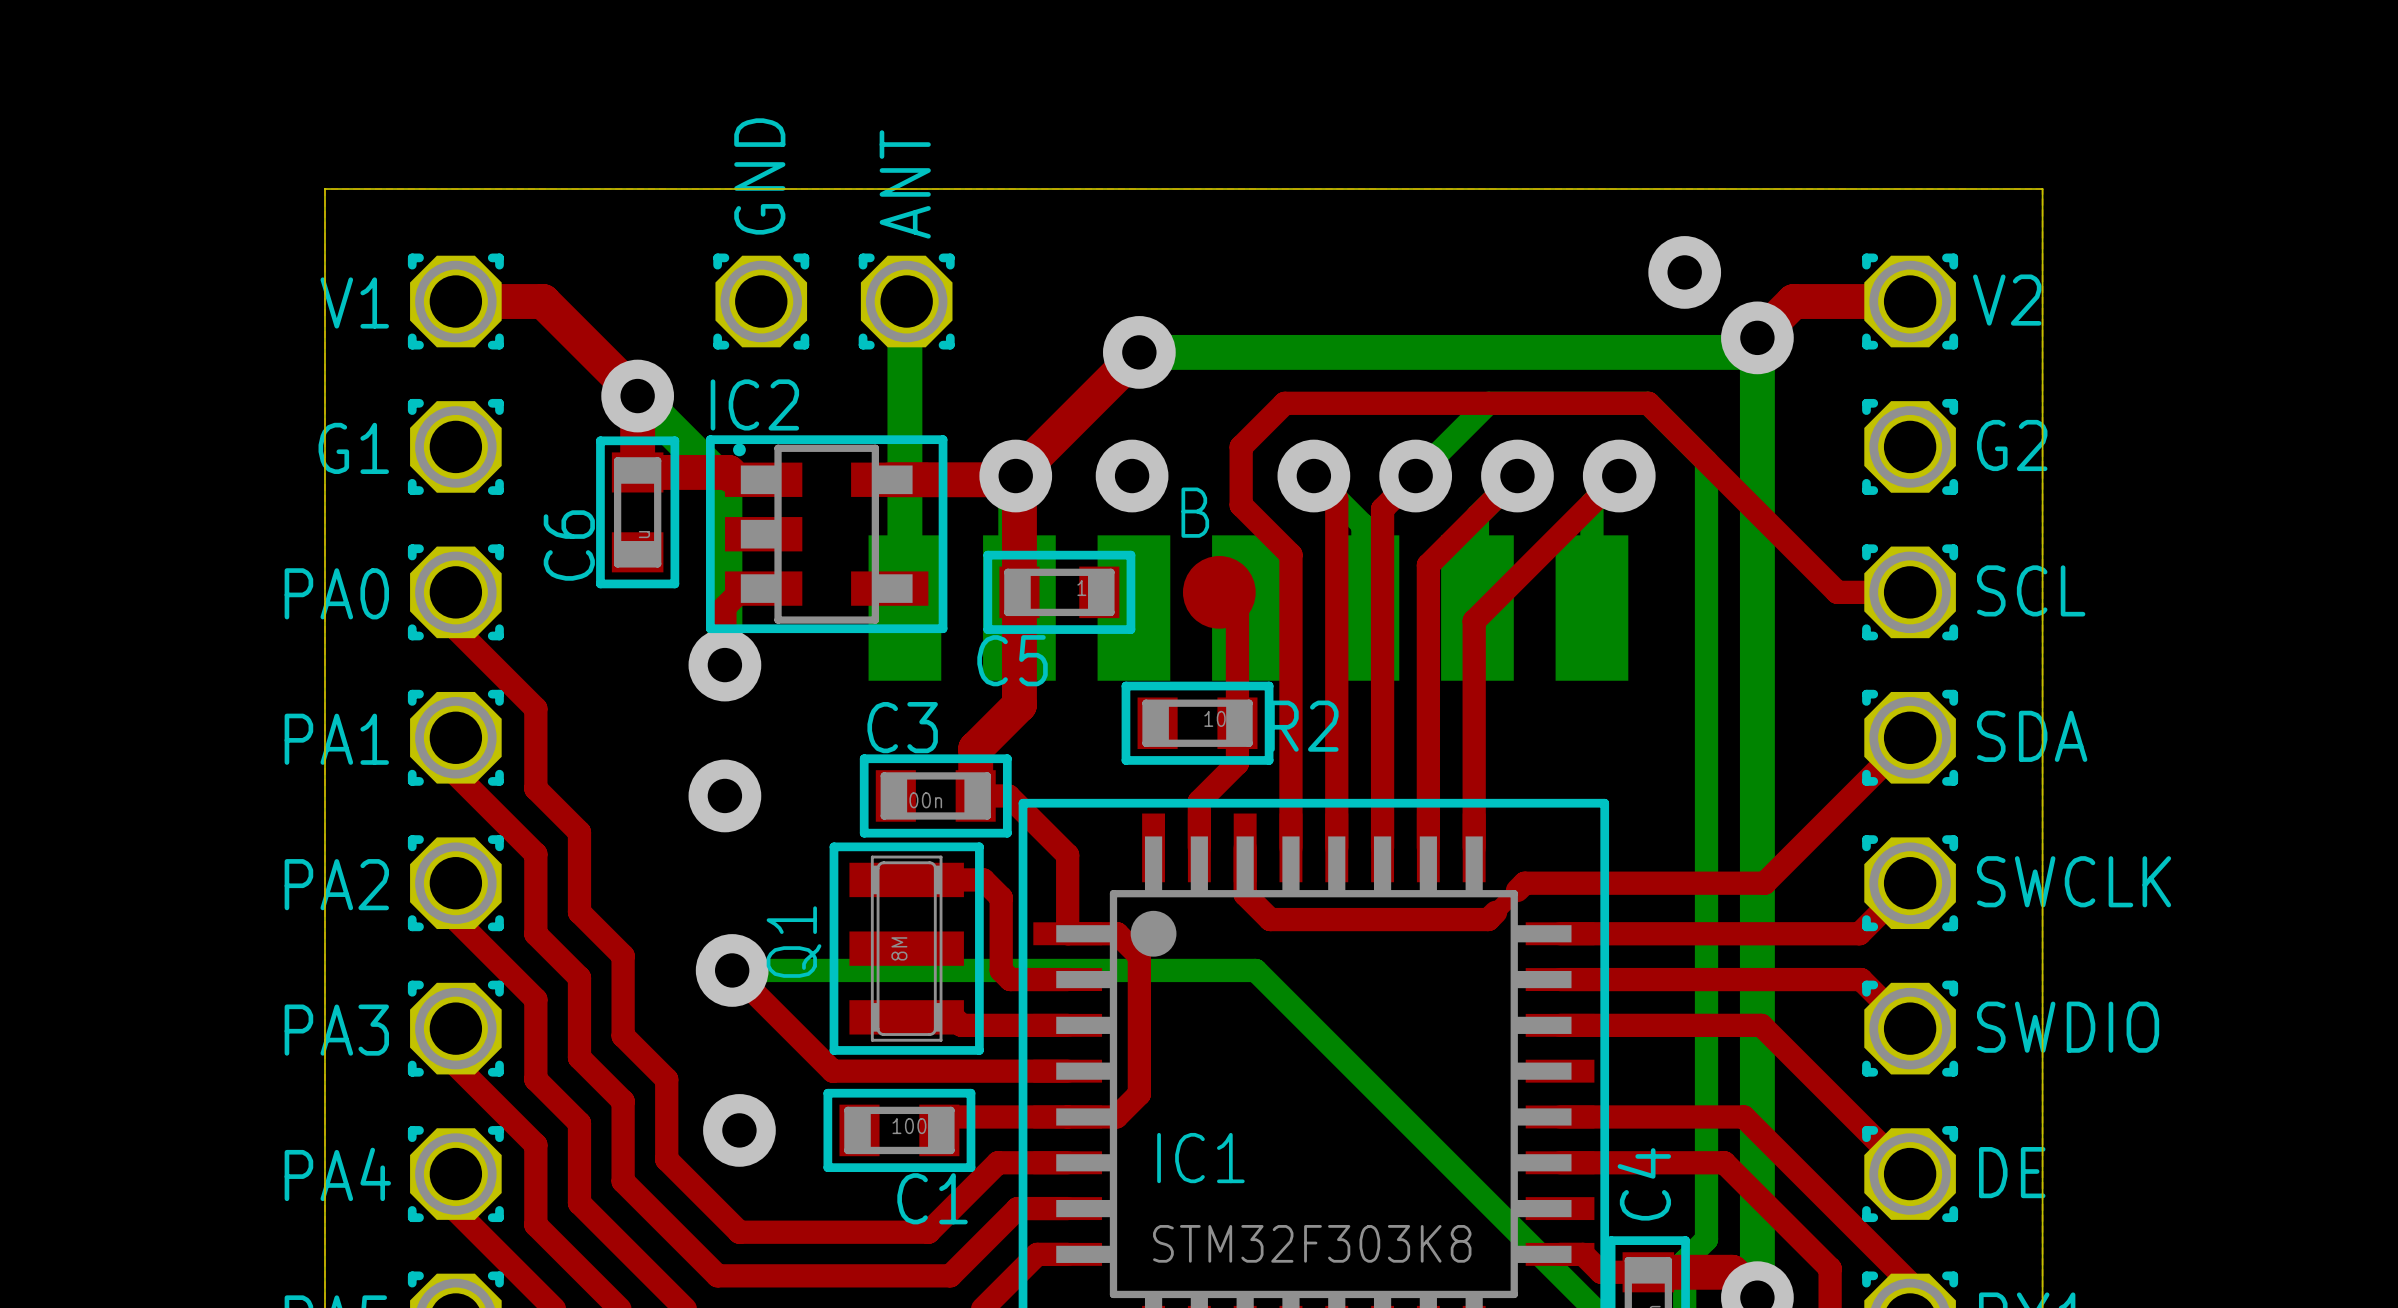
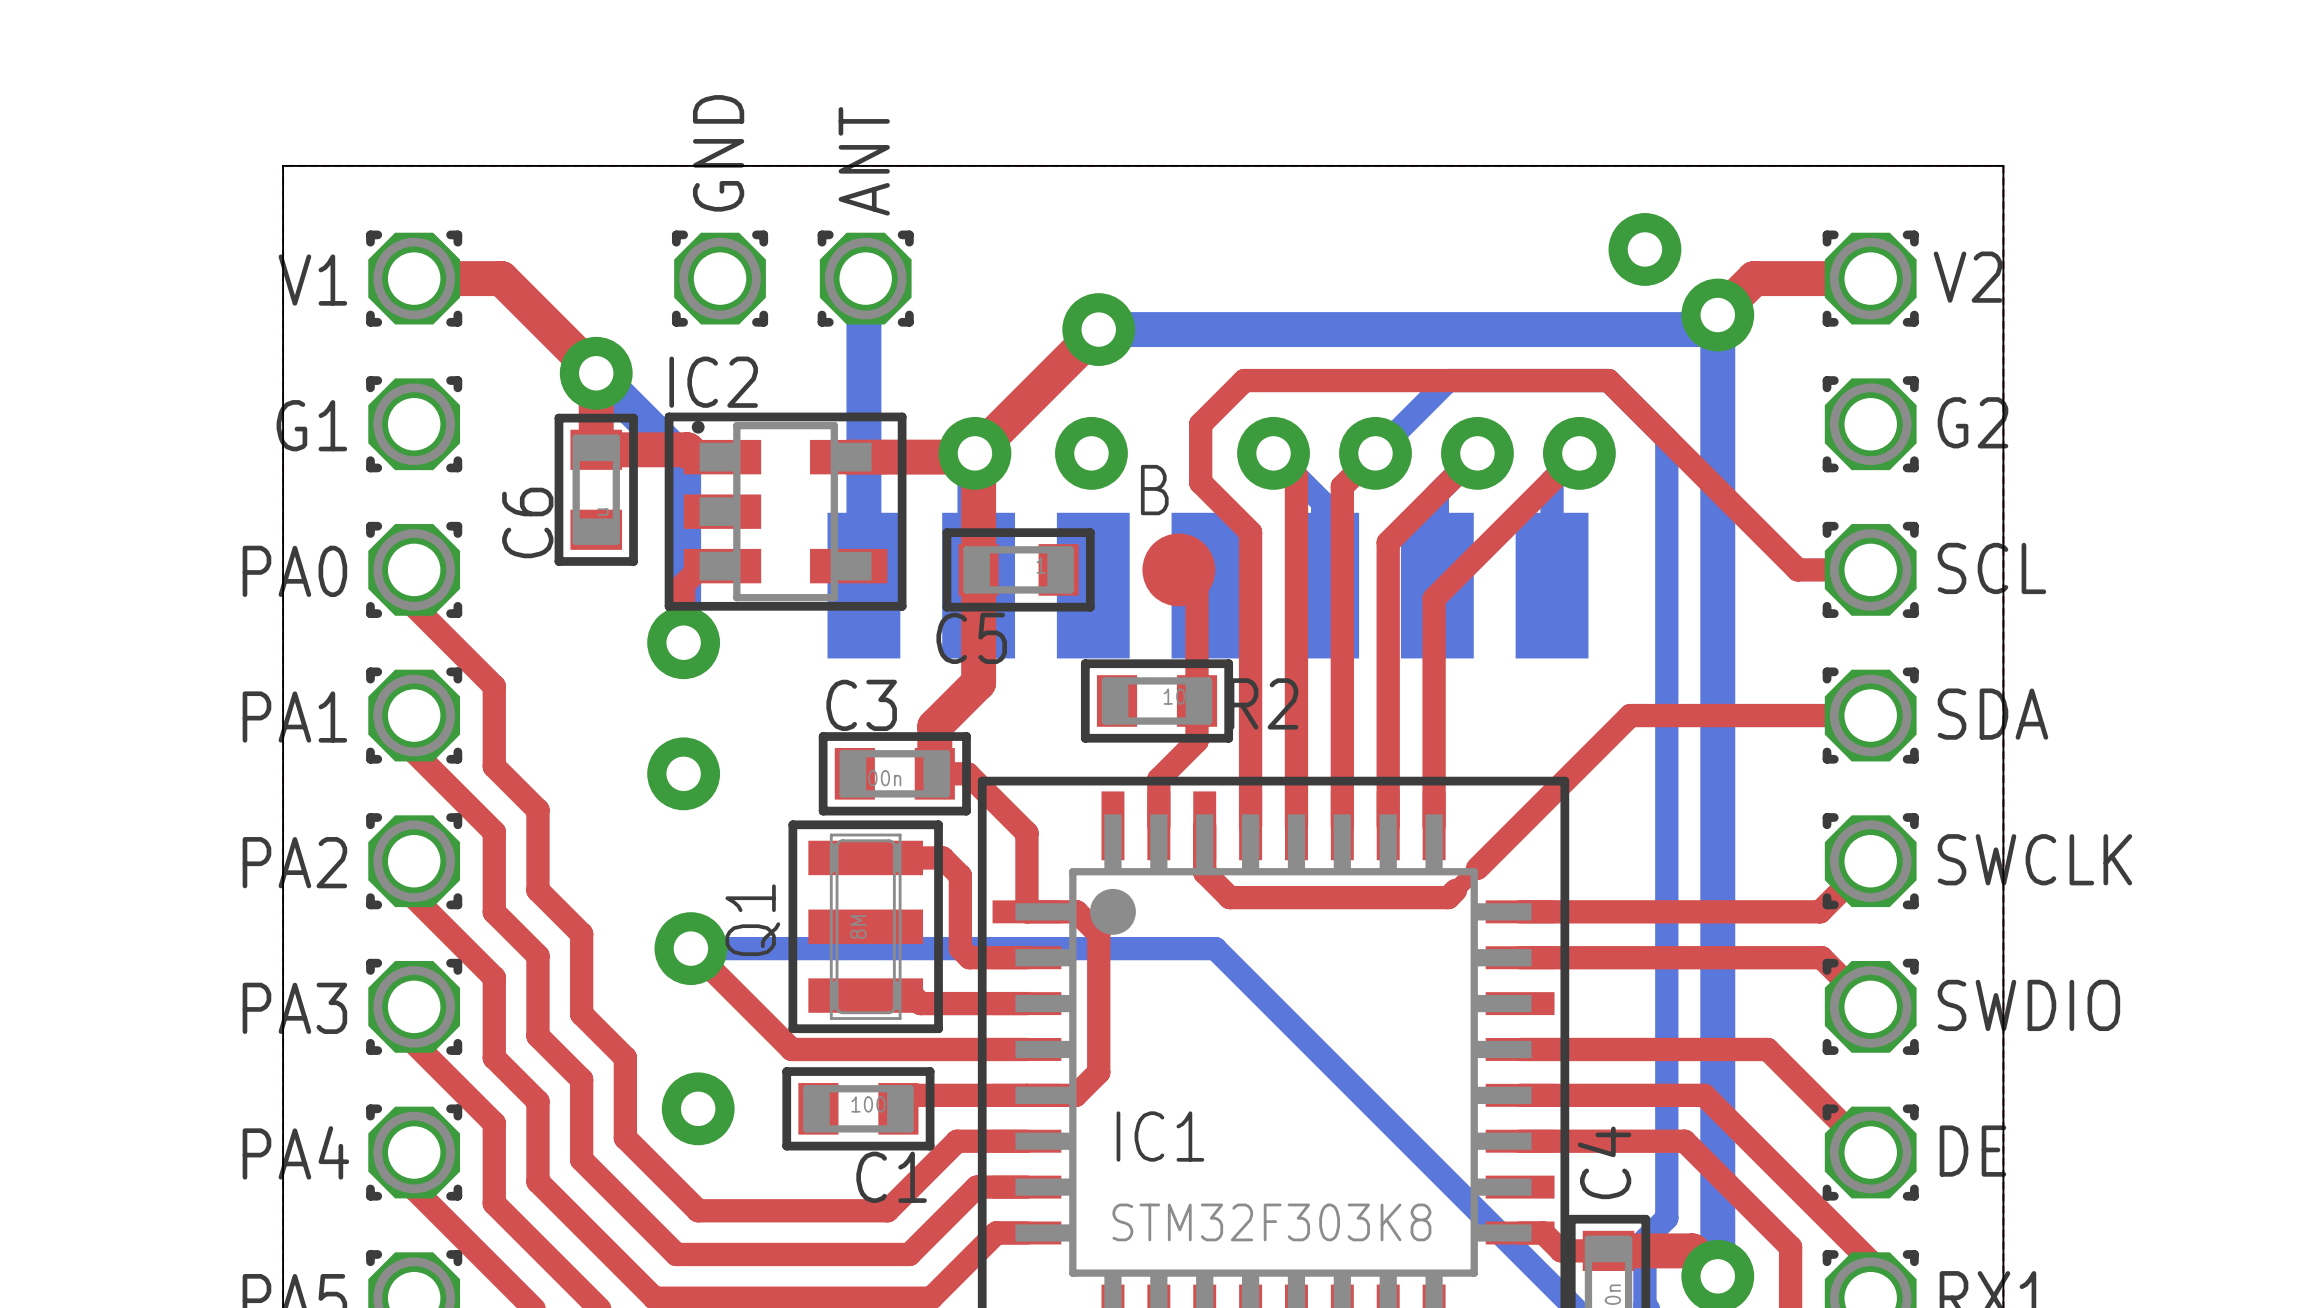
top track: (1910, 737) (1764, 883) (1524, 883) -> (1870, 715) (1630, 715) (1484, 861)
top track: (1560, 1025) (1761, 1025) (1807, 1071) -> (1520, 1049) (1767, 1049)

